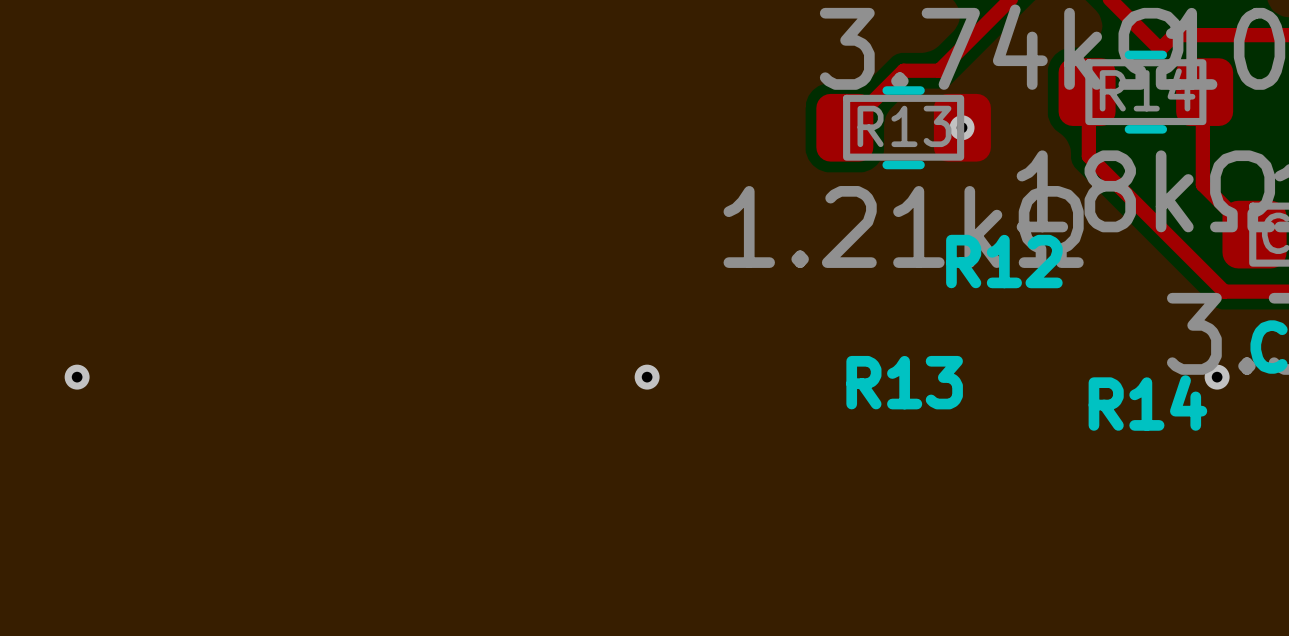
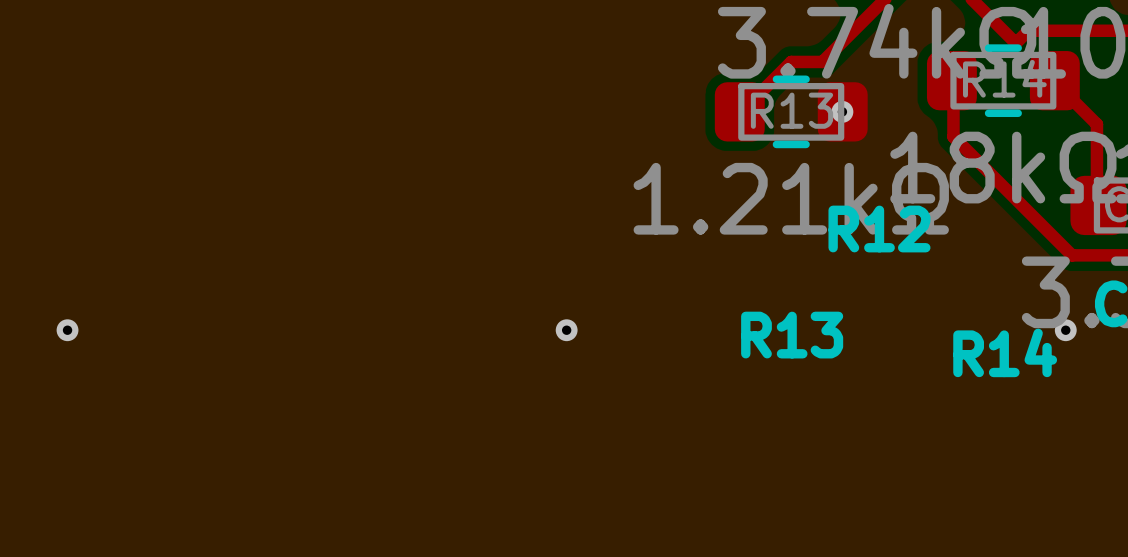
top track: (1202, 92) (1202, 184) (1252, 234) -> (1053, 80) (1096, 124) (1096, 205)

